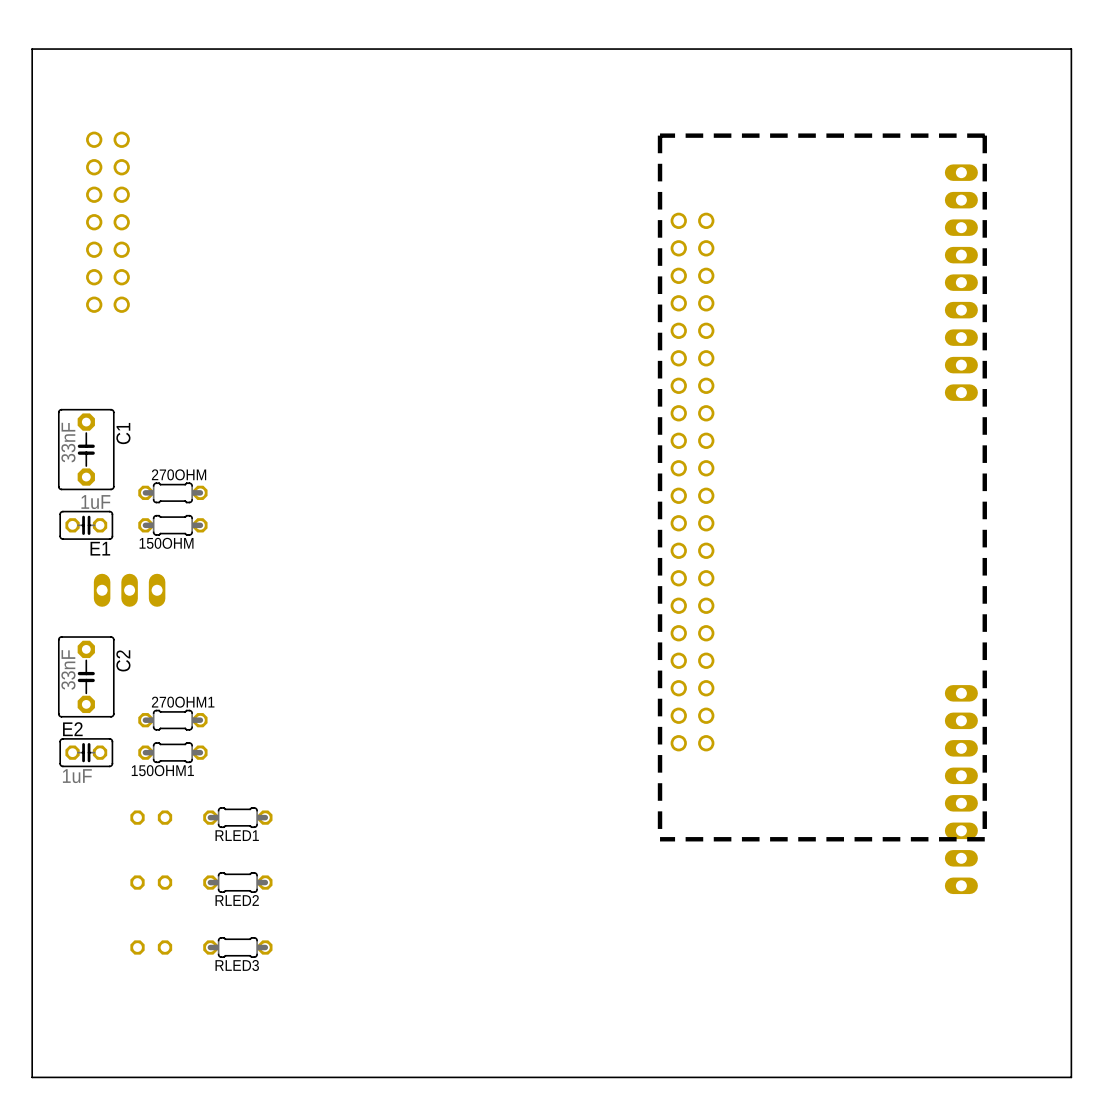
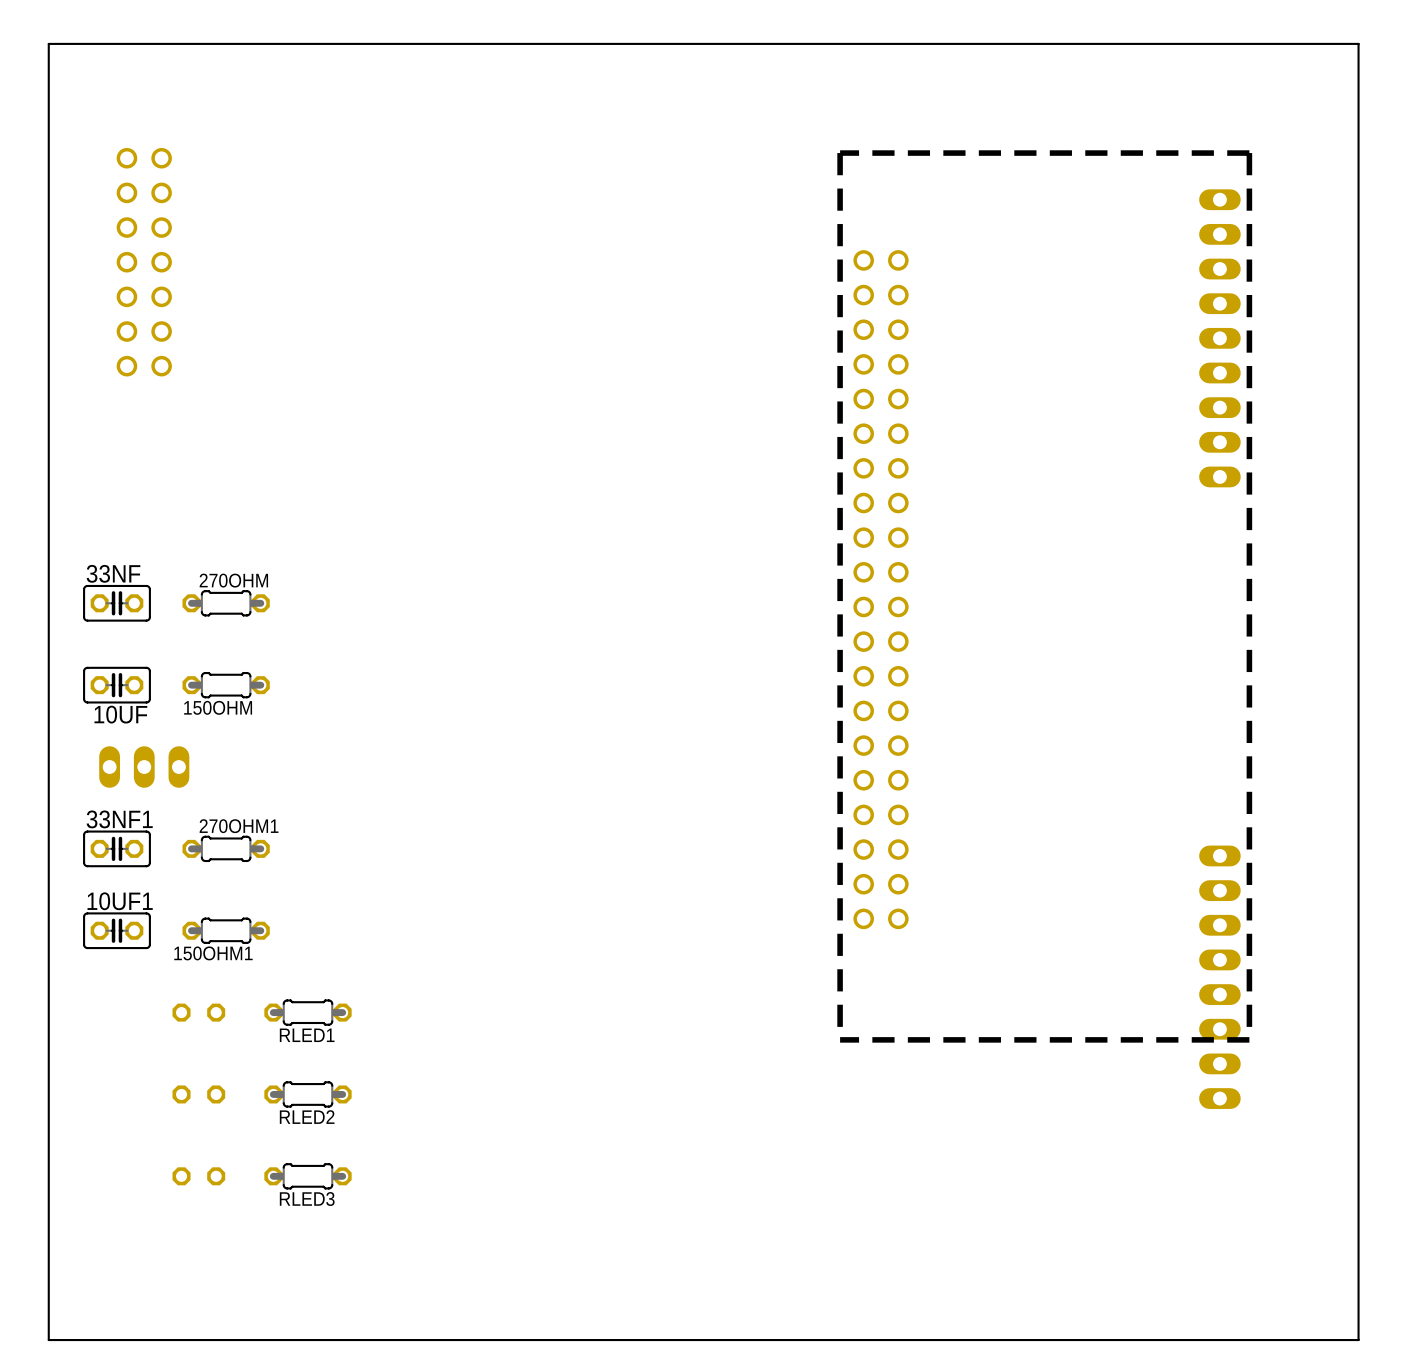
C1: 33nF (86, 449) -> none
33NF: none -> (116, 603)
E1: 1uF (86, 525) -> none
150OHM position: (172, 525) -> (226, 685)
10UF: none -> (116, 685)
part position: (129, 590) -> (144, 767)
C2: 33nF (86, 676) -> none
33NF1: none -> (116, 848)
270OHM1 position: (172, 720) -> (226, 848)
E2 name: E2 (72, 729) -> 10UF1 (120, 901)
E2 value: 1uF (77, 776) -> none

